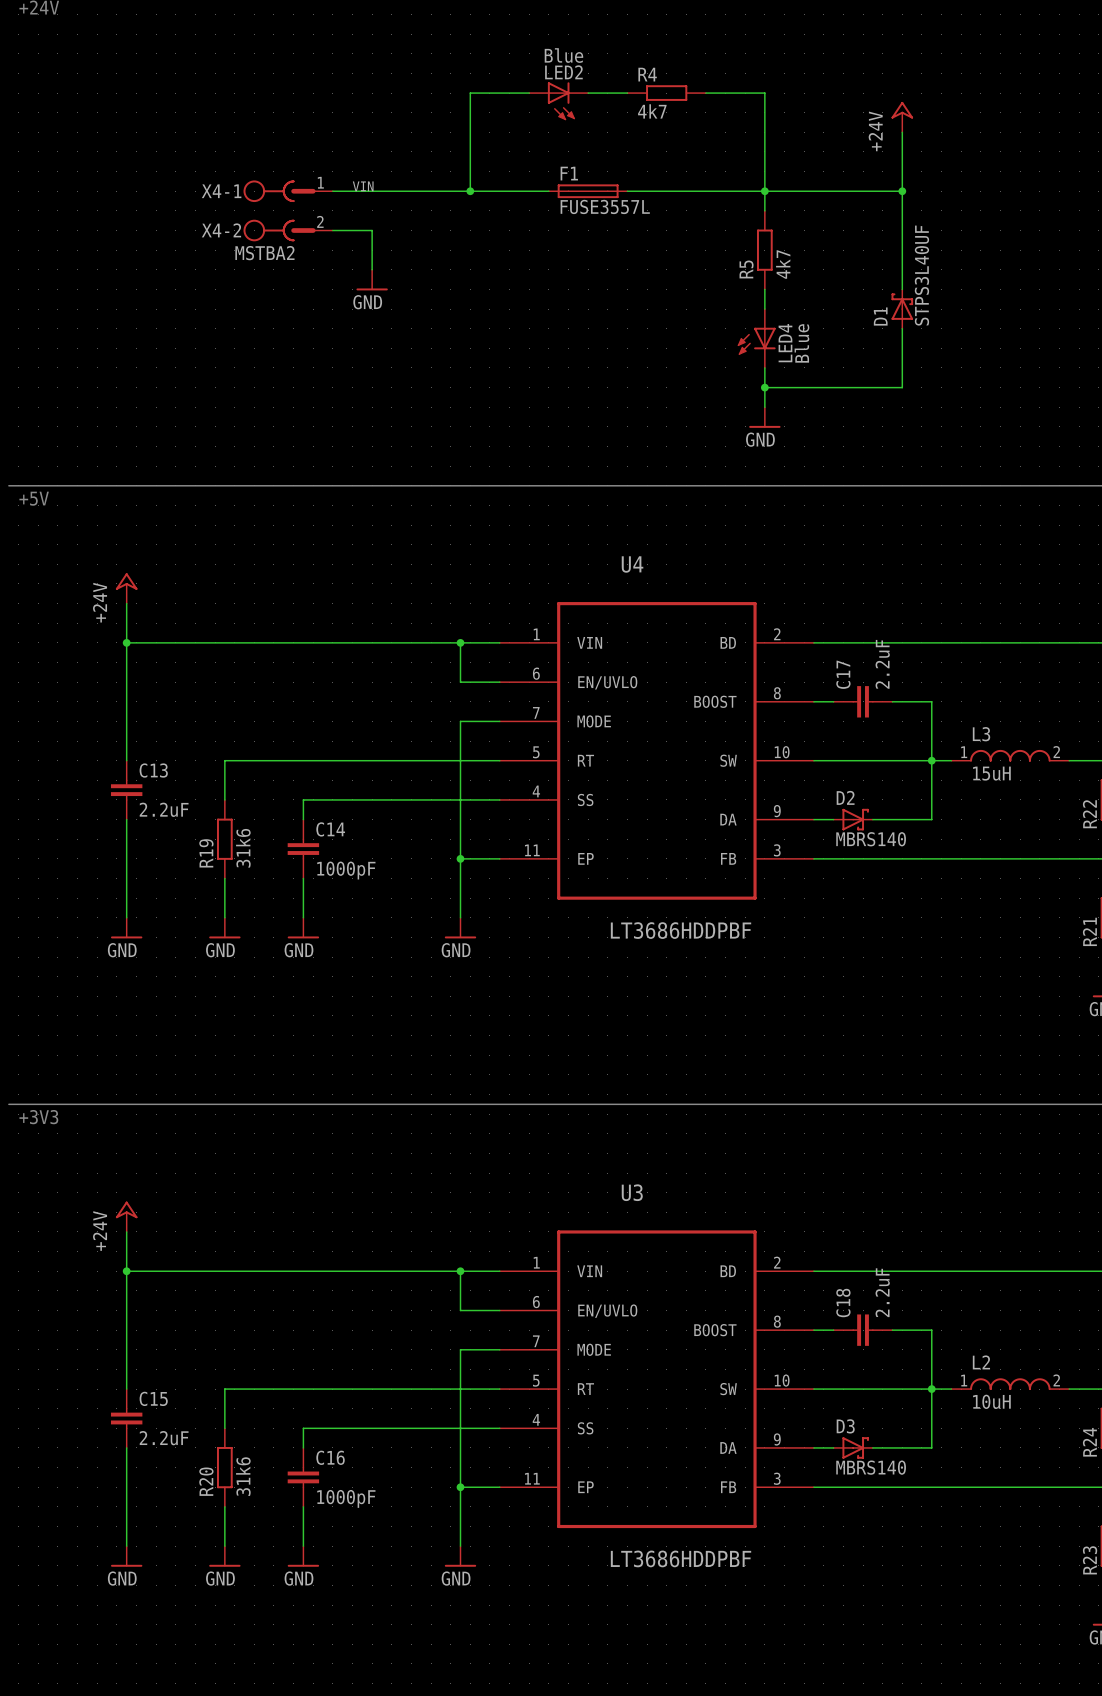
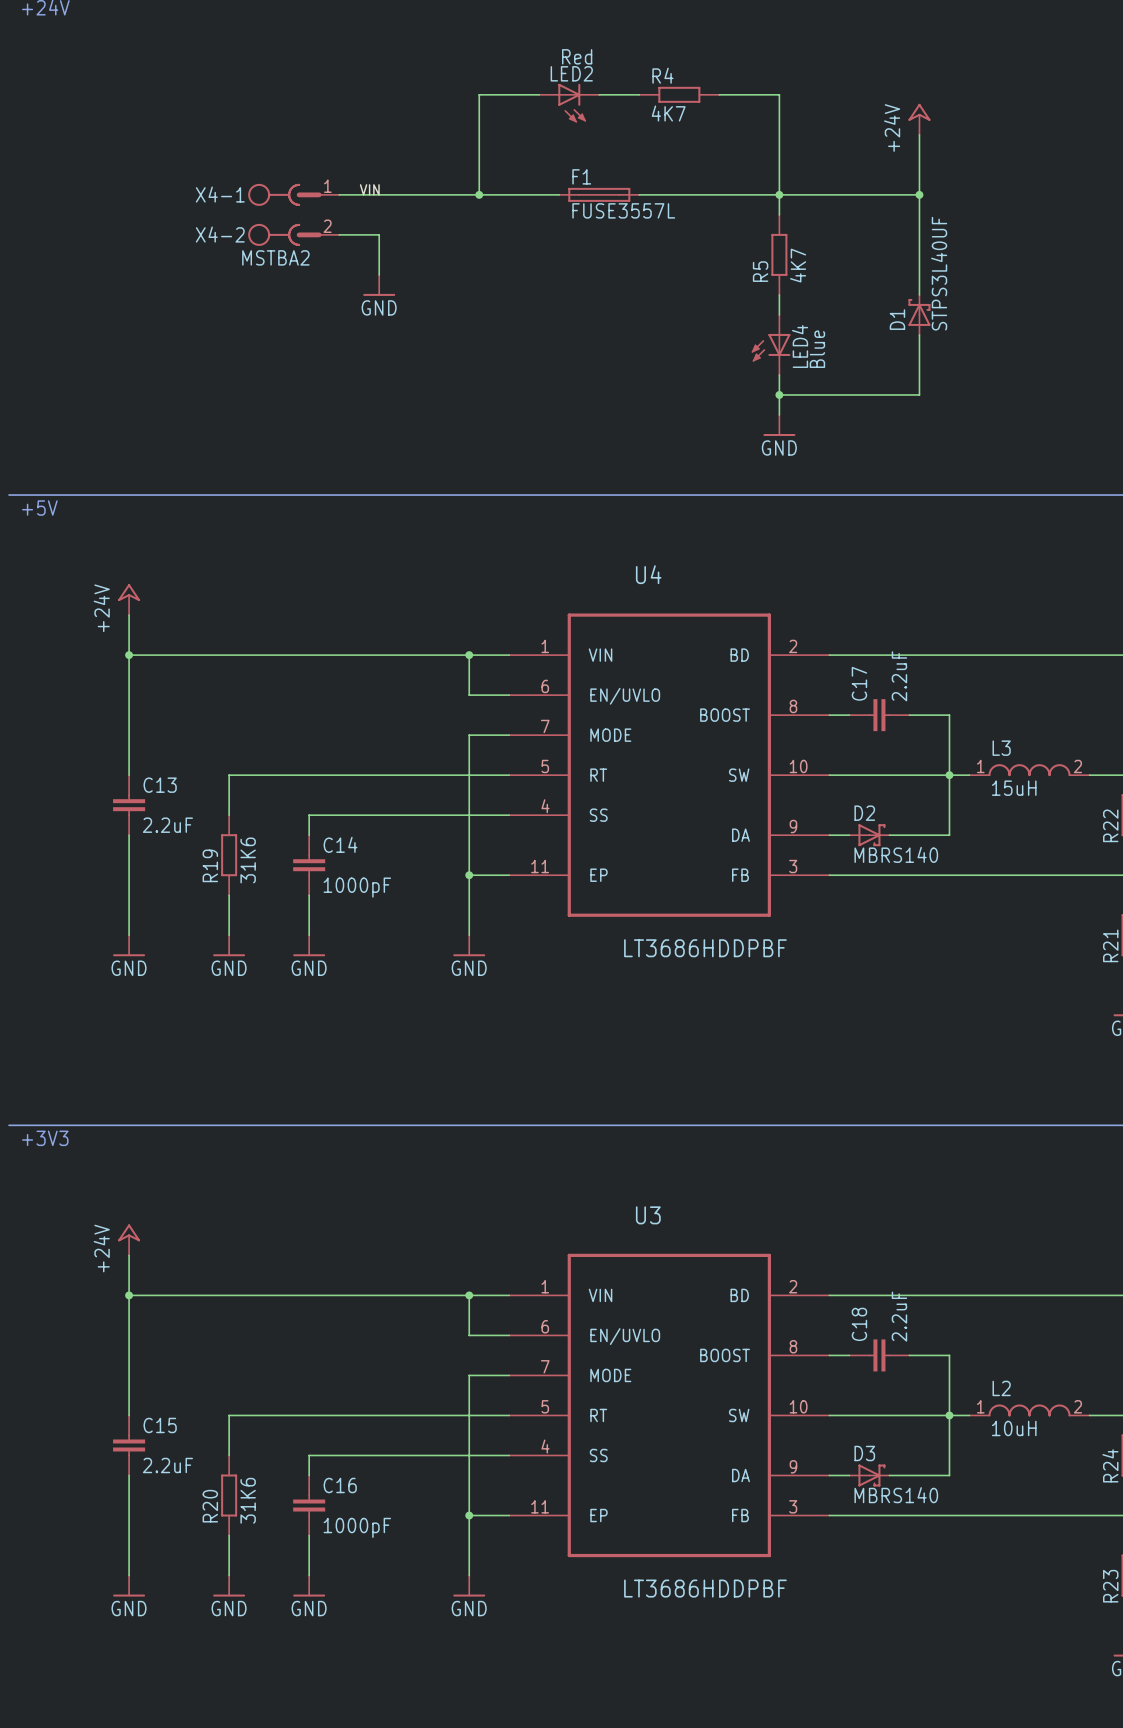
LED2 value: Blue (563, 55) -> Red (577, 56)
R4 value: 4k7 (652, 111) -> 4K7 (668, 113)
R5 value: 4k7 (783, 264) -> 4K7 (798, 265)
R19 value: 31k6 (243, 848) -> 31K6 (248, 860)
R20 value: 31k6 (243, 1476) -> 31K6 (248, 1500)

